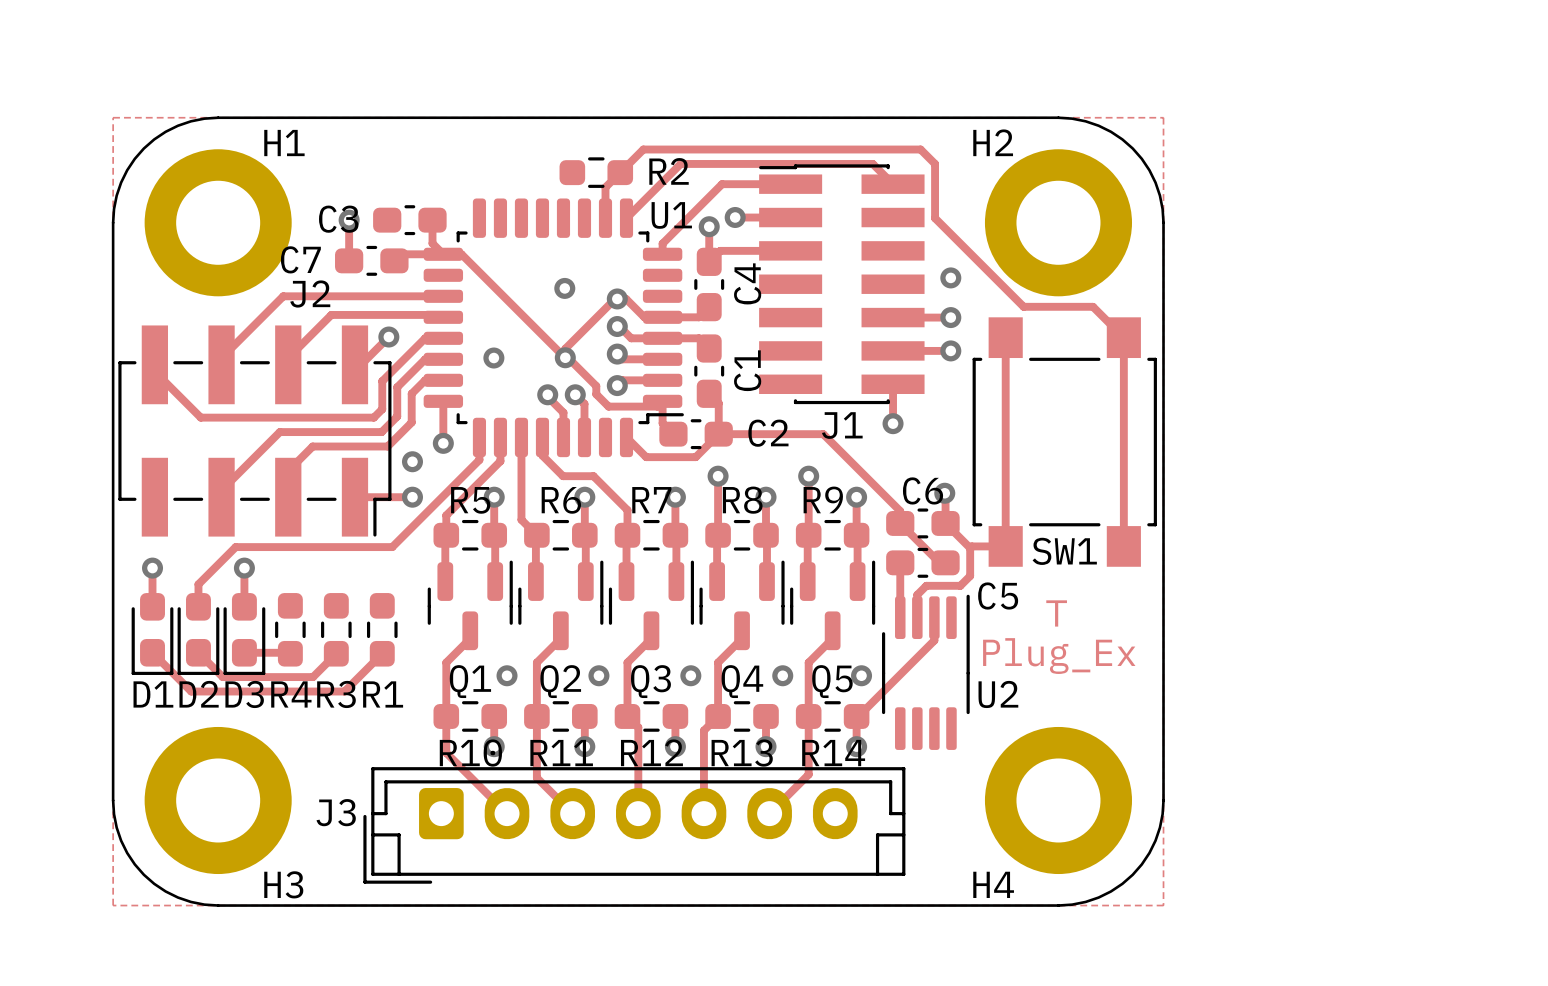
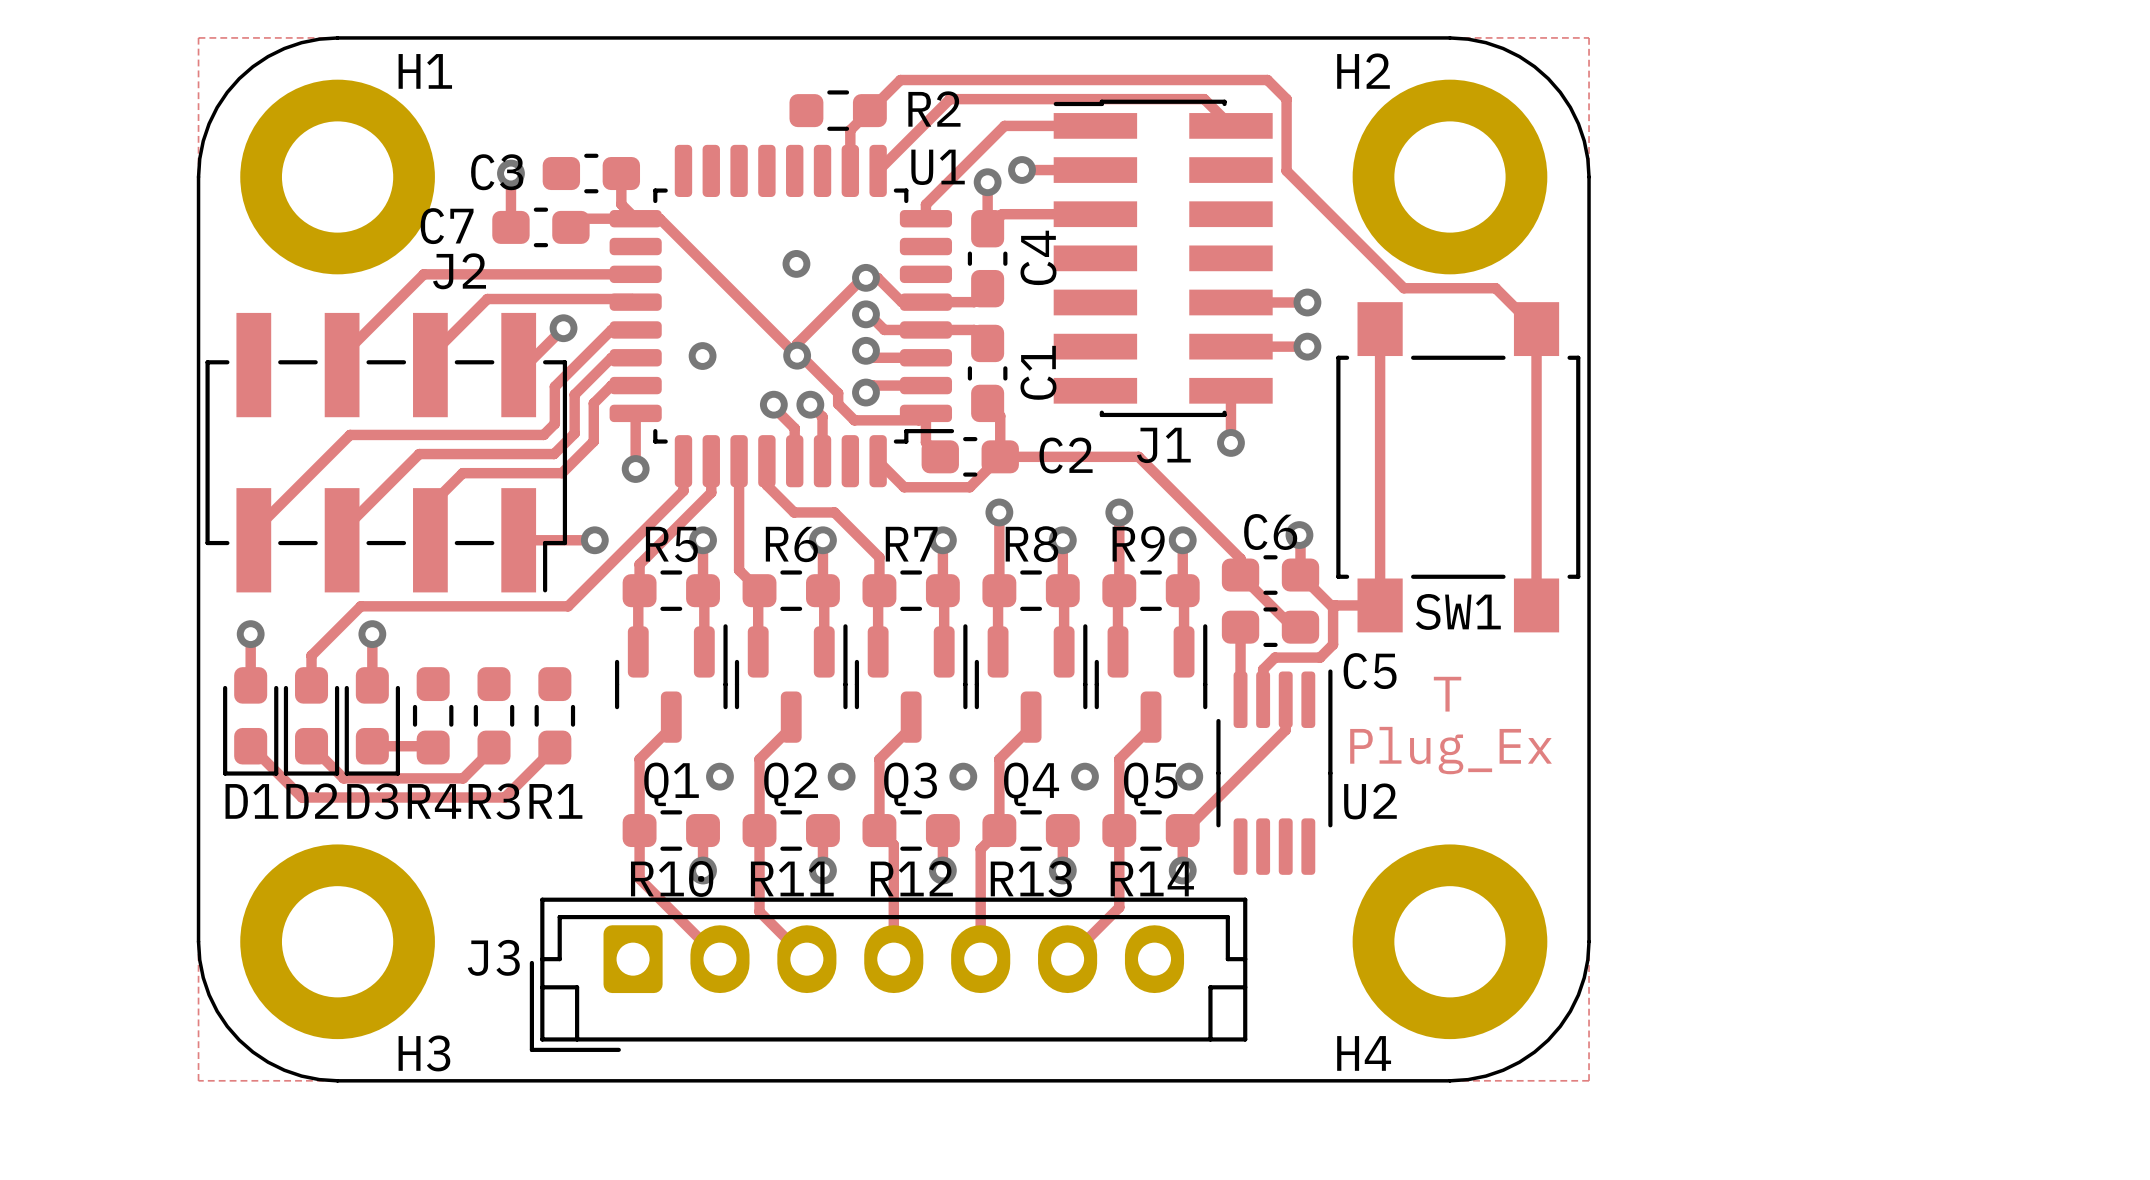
via: (950, 277) -> none
track: (154, 364) (154, 371) (200, 417) (227, 417) -> (253, 531) (350, 434)
via: (412, 461) -> none

